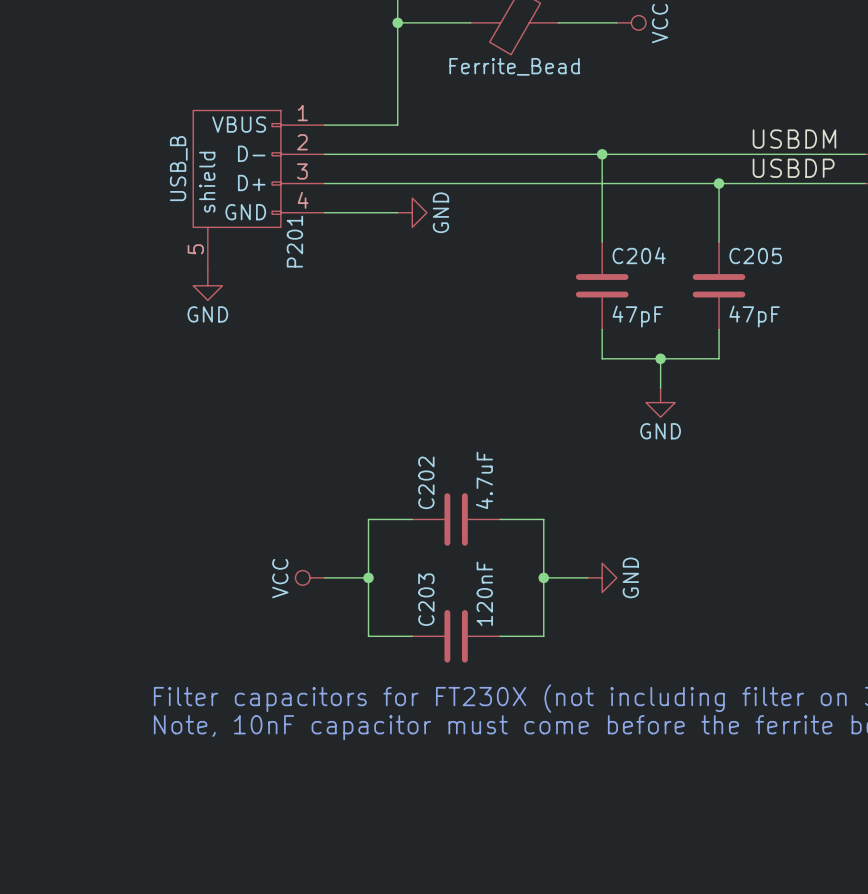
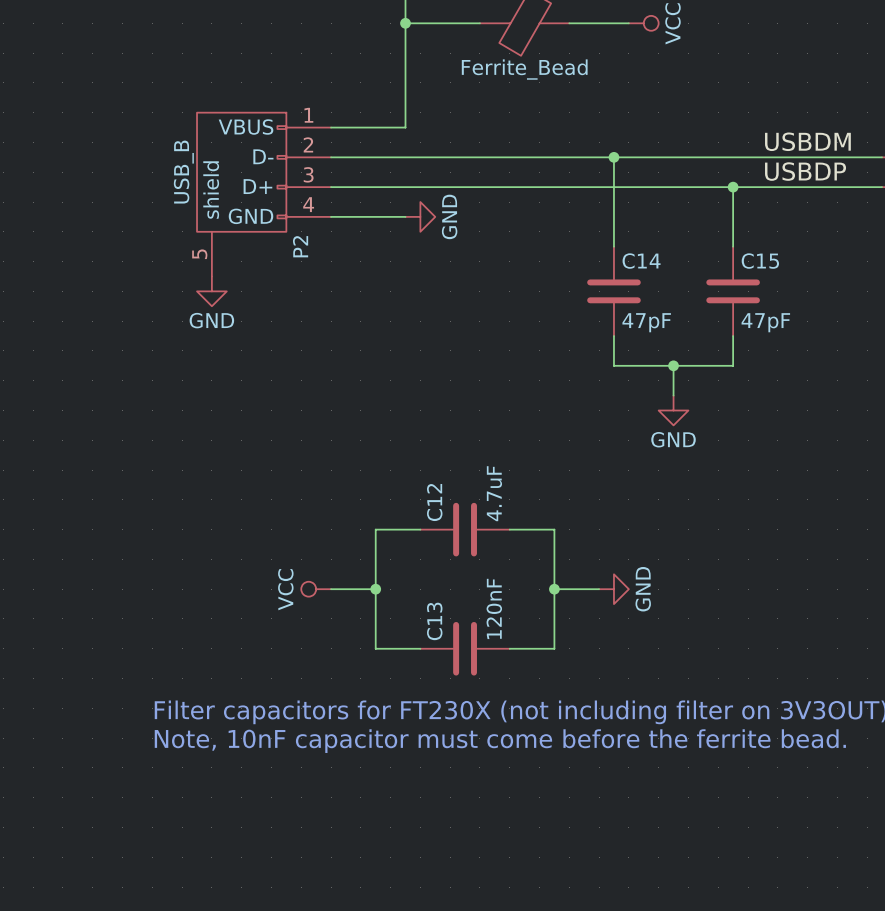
P201 name: P201 (294, 241) -> P2 (300, 246)
C204 name: C204 (639, 255) -> C14 (641, 261)
C205 name: C205 (755, 256) -> C15 (760, 261)
C202 name: C202 (426, 482) -> C12 (434, 502)
C203 name: C203 (426, 599) -> C13 (434, 621)

